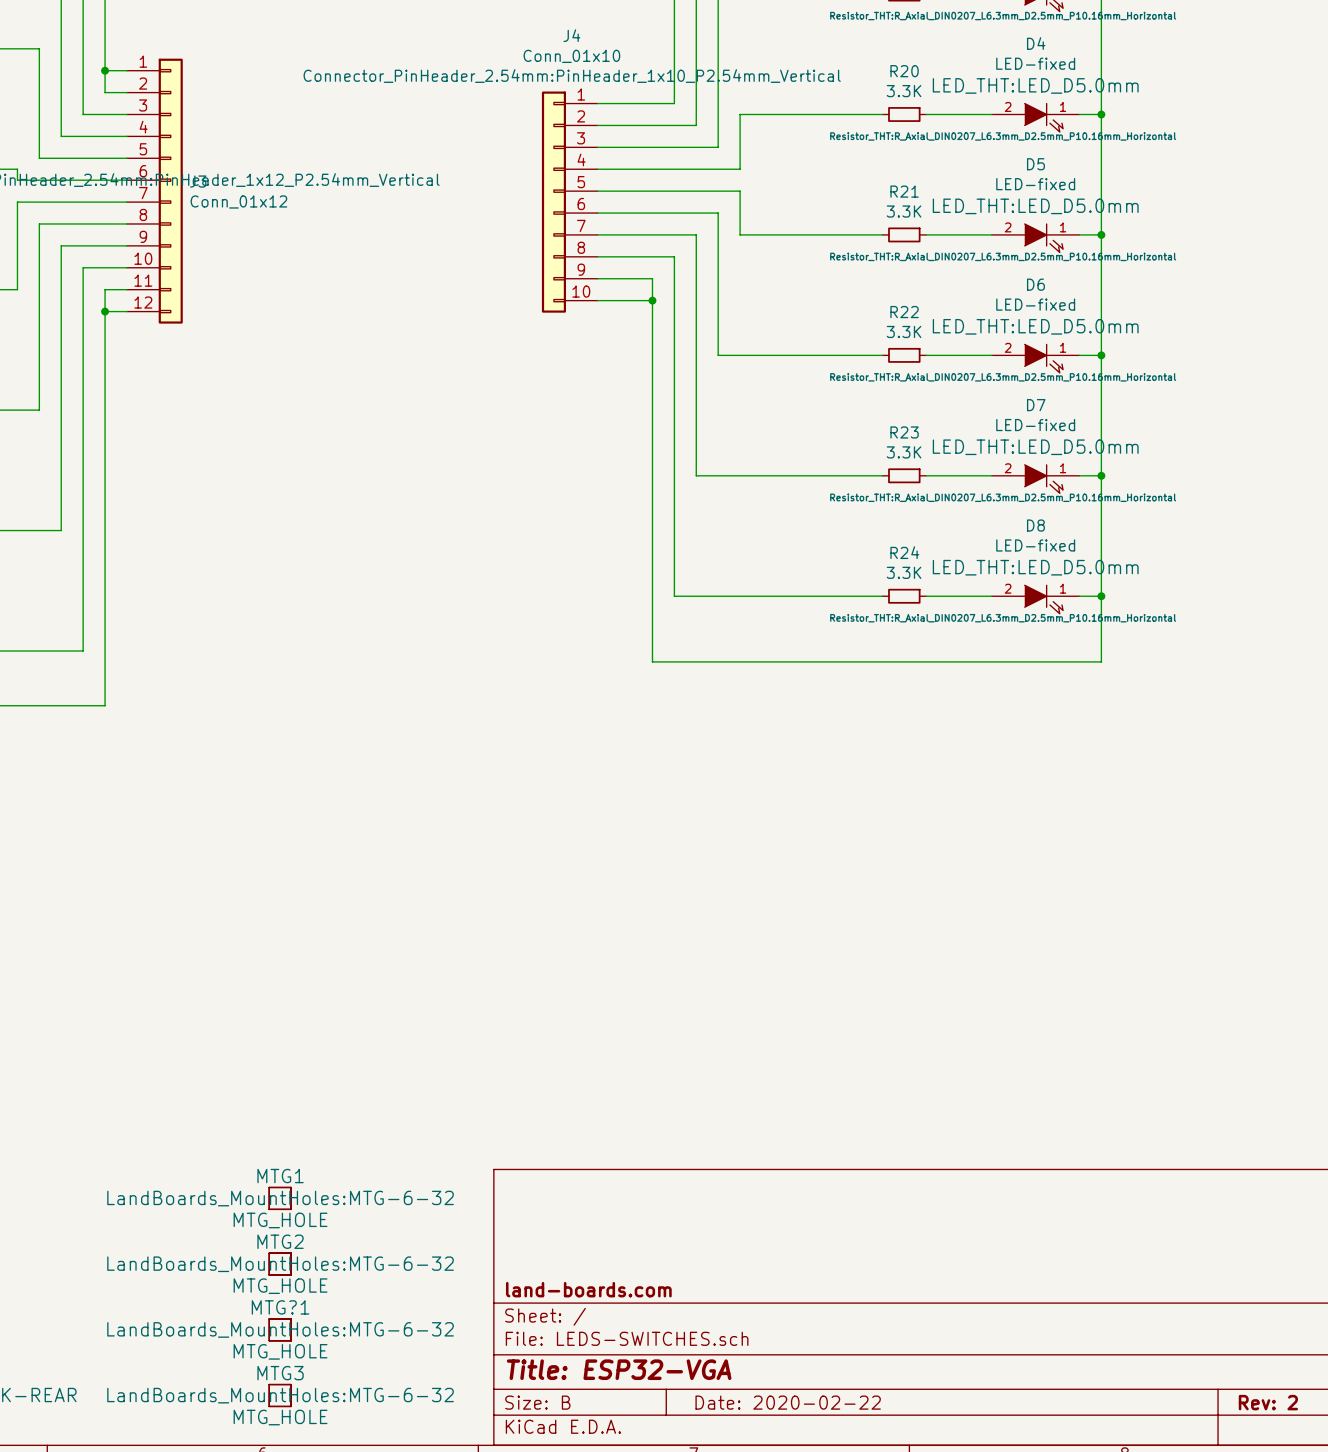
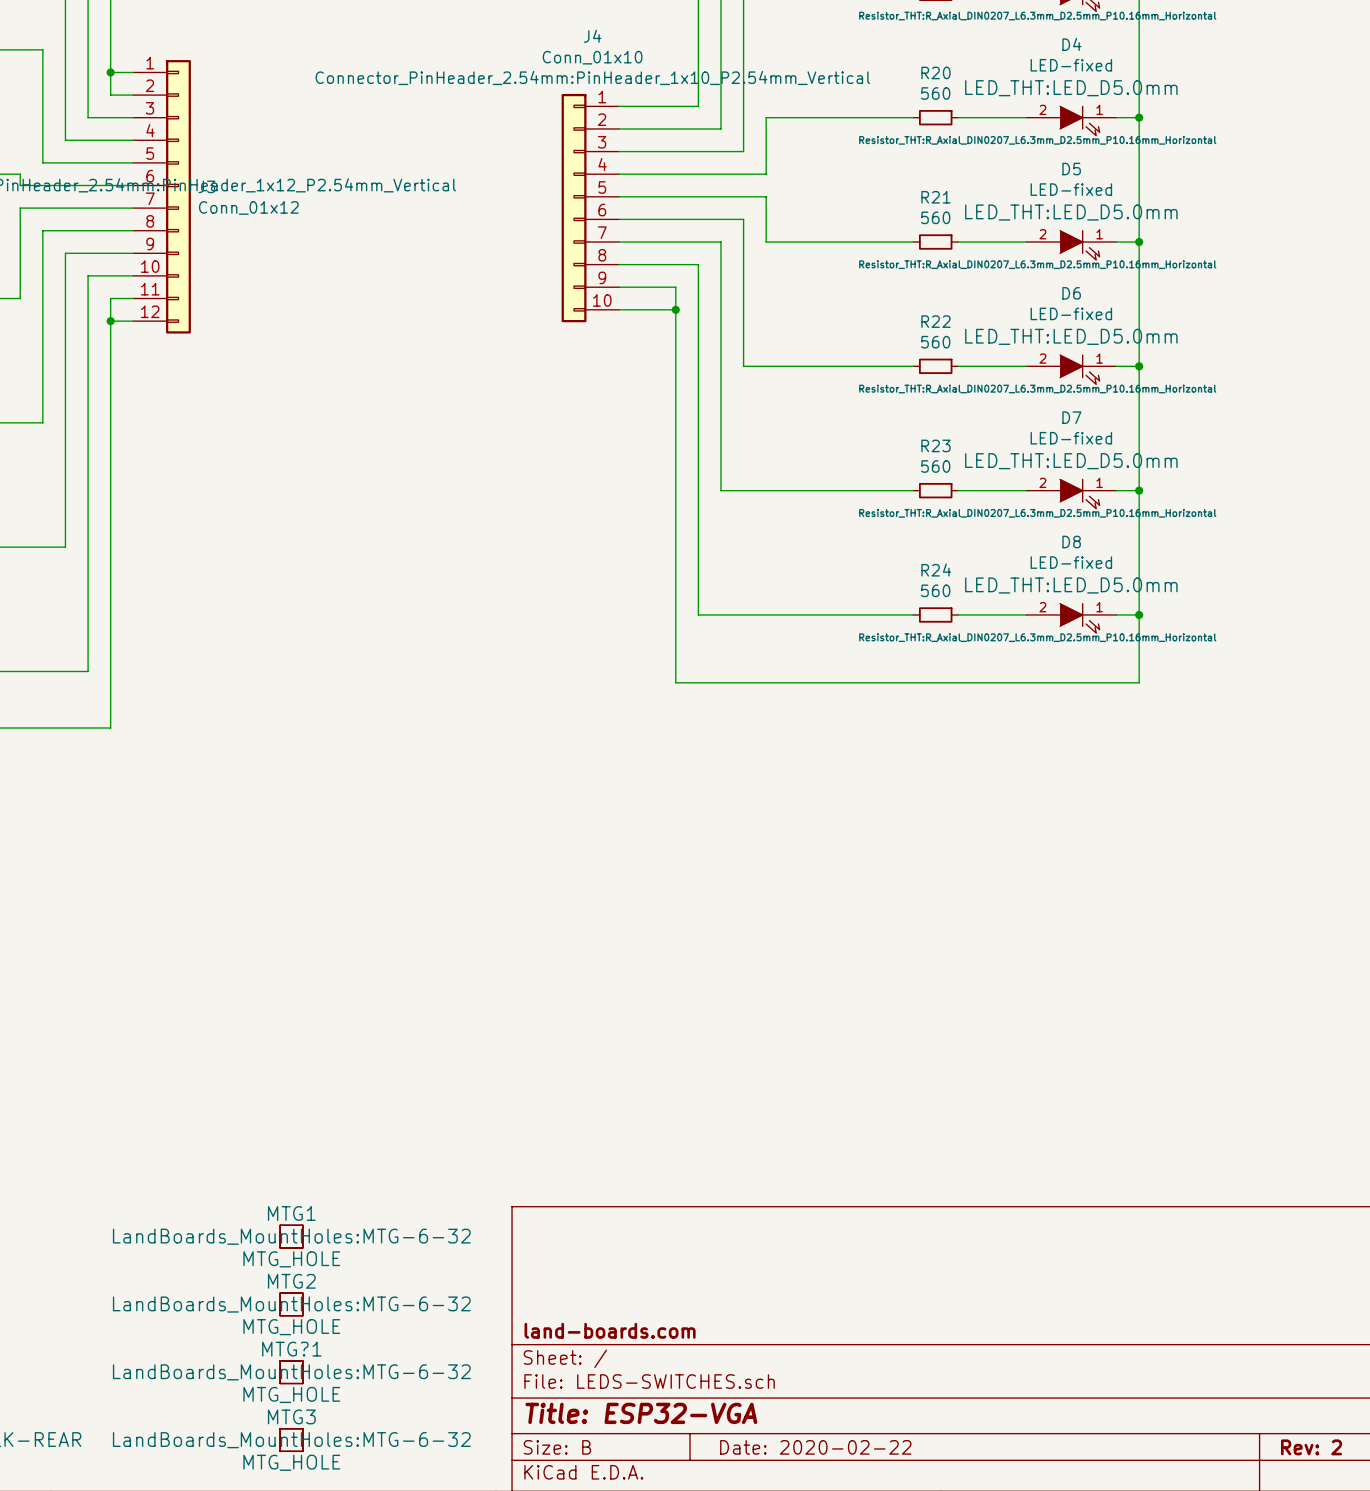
R20 value: 3.3K (904, 91) -> 560 (935, 93)
R21 value: 3.3K (904, 211) -> 560 (935, 217)
R22 value: 3.3K (904, 331) -> 560 (935, 342)
R23 value: 3.3K (904, 452) -> 560 (935, 466)
R24 value: 3.3K (904, 572) -> 560 (935, 590)

